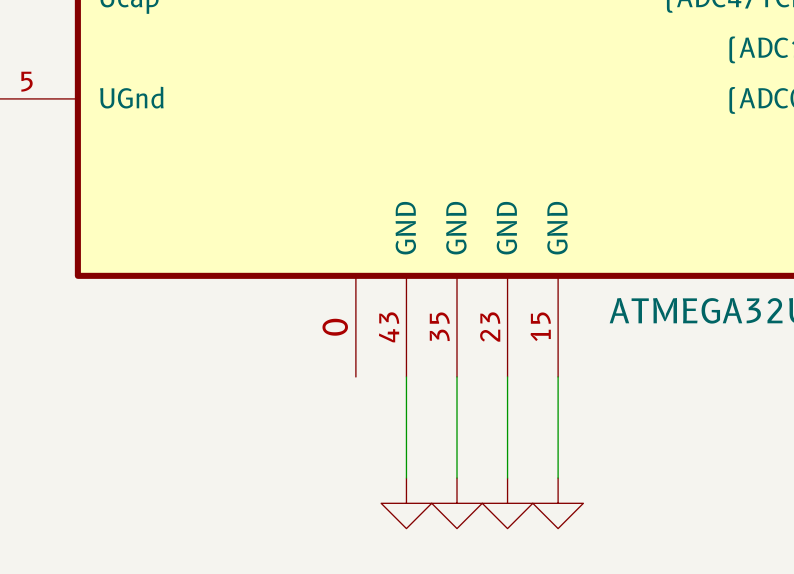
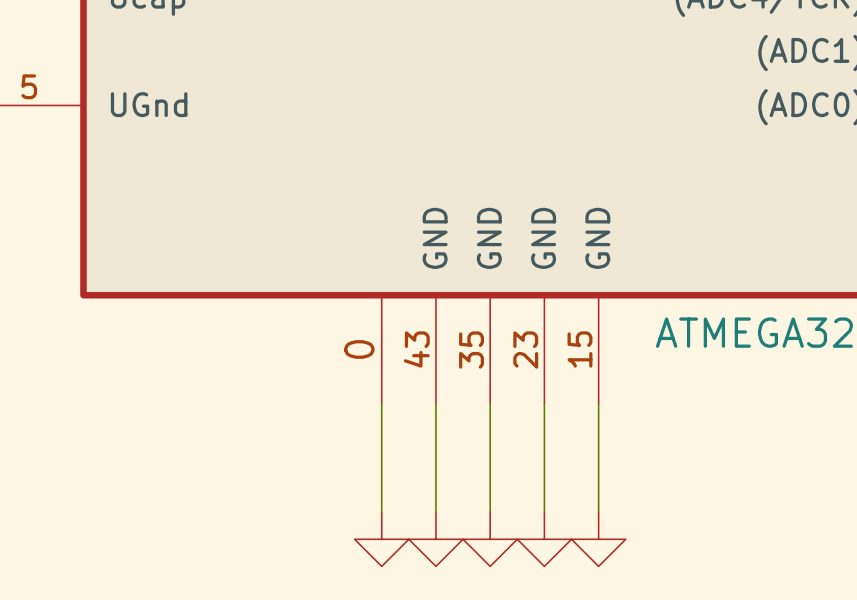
wire: none -> (381, 403) (381, 512)
power symbol: none -> (381, 539)

